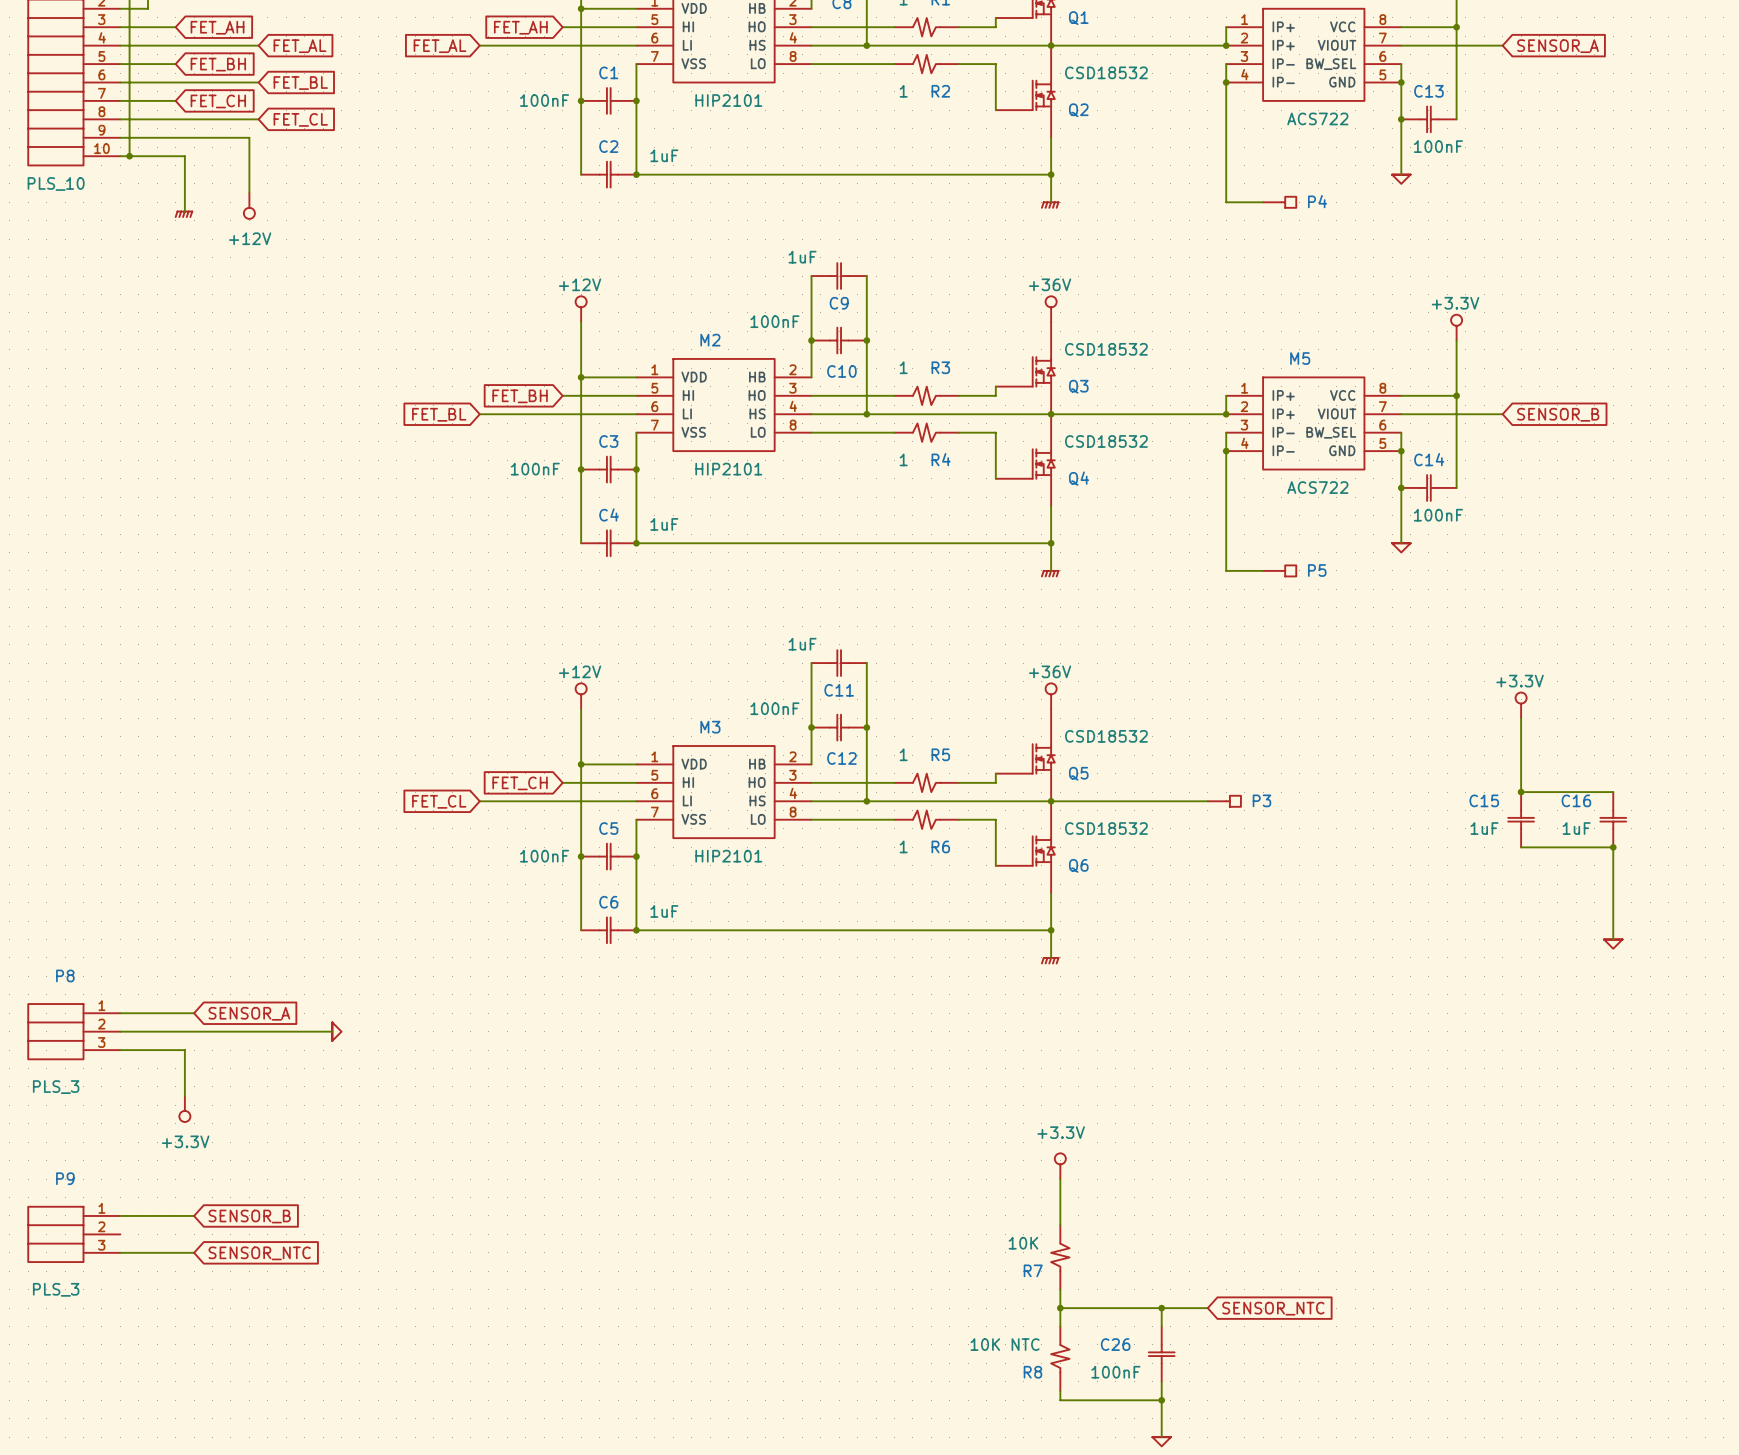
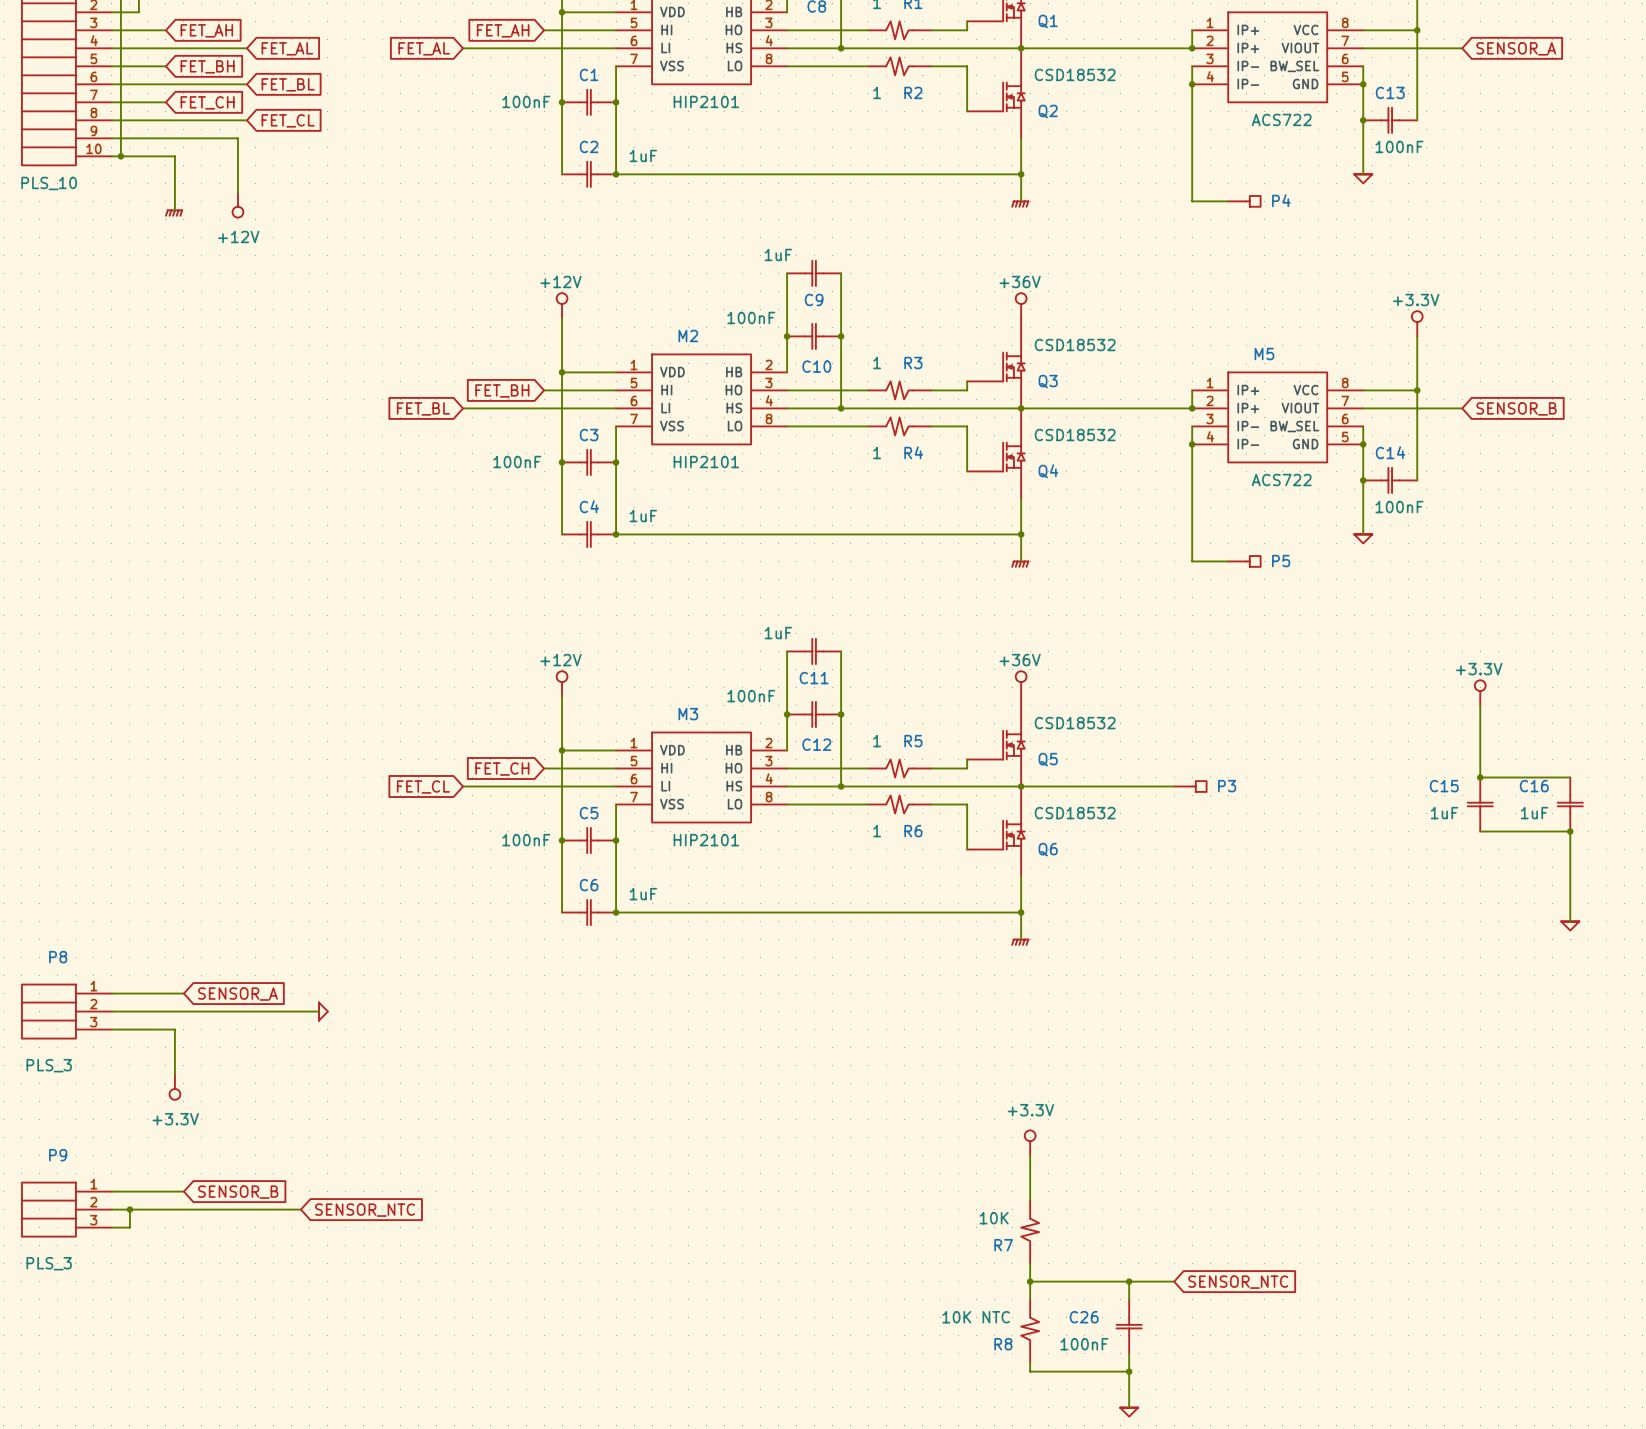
wire: none -> (111, 1209) (300, 1209)
junction: none -> (129, 1209)
wire: (138, 1252) (194, 1252) -> (129, 1227) (129, 1209)
global label position: SENSOR_NTC (259, 1253) -> SENSOR_NTC (365, 1210)

